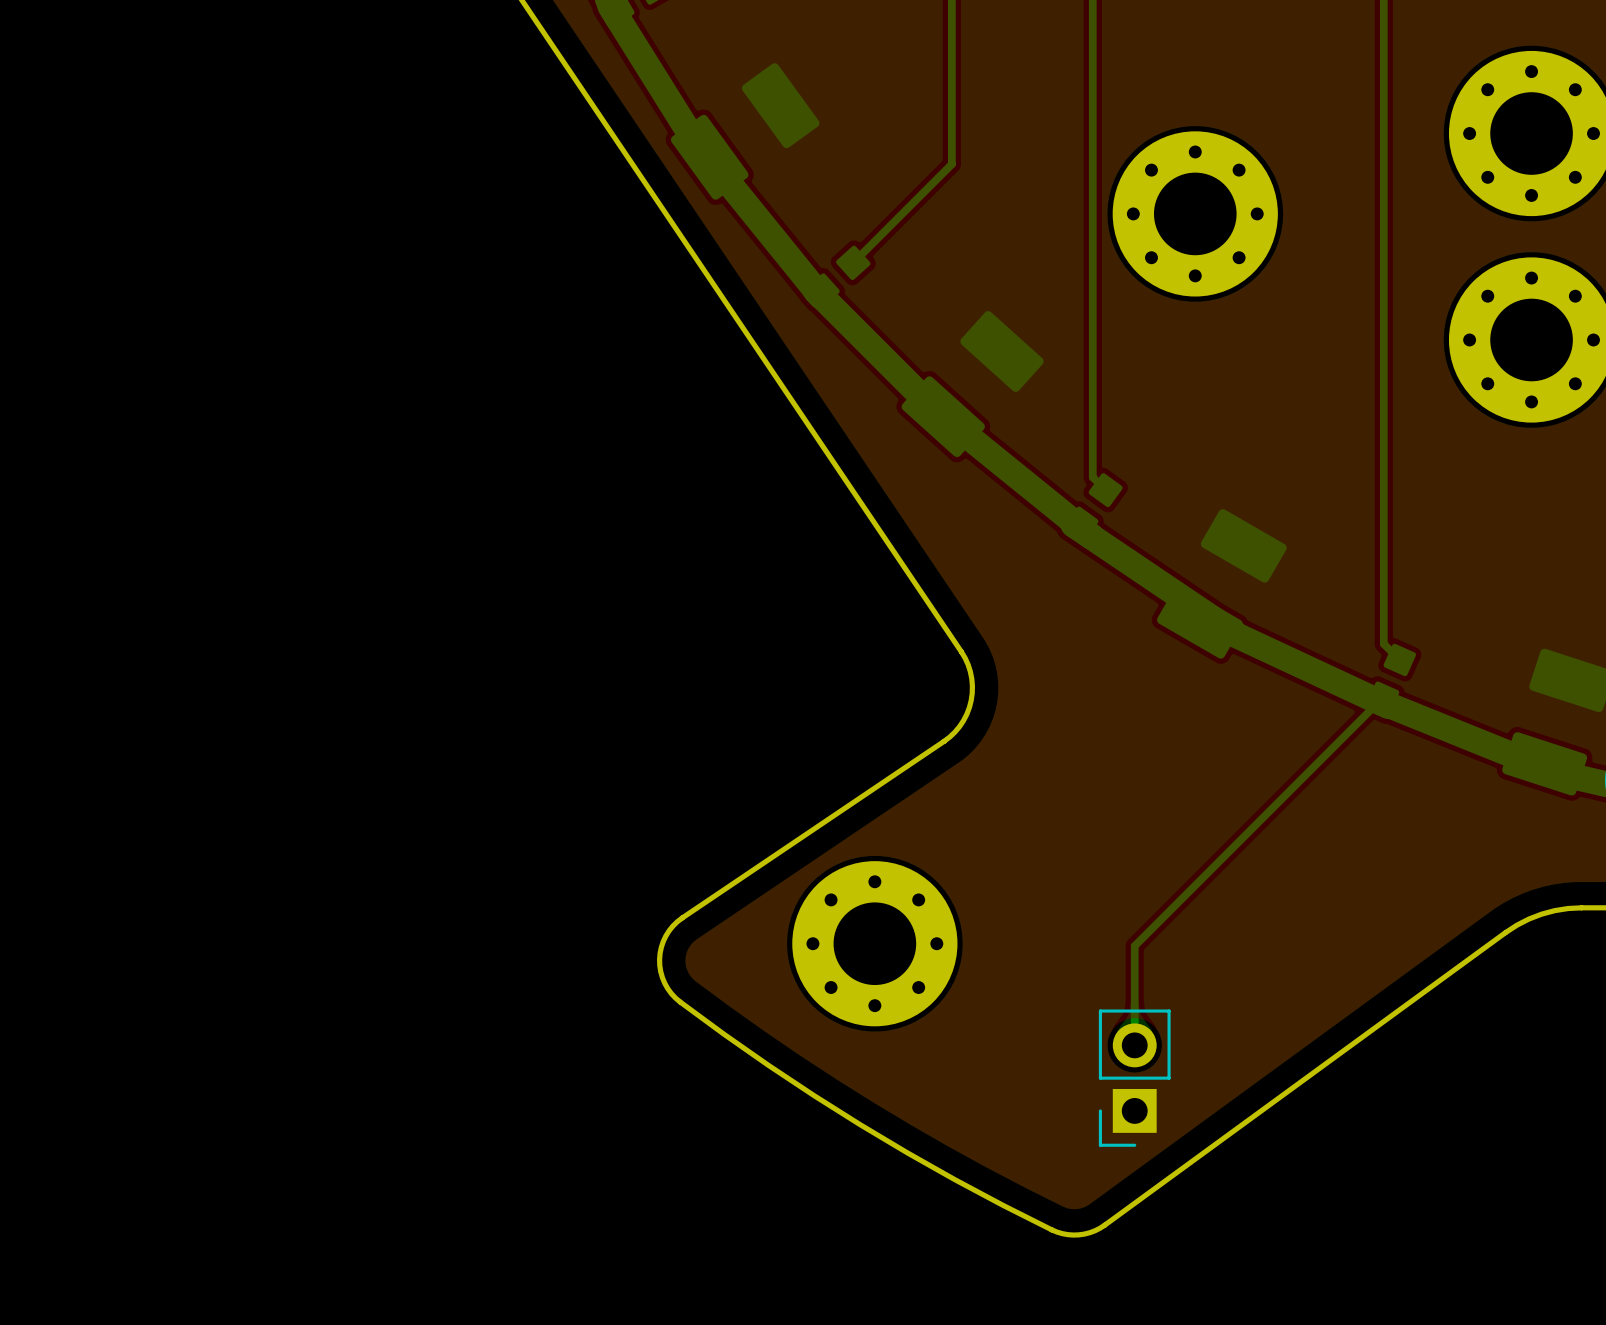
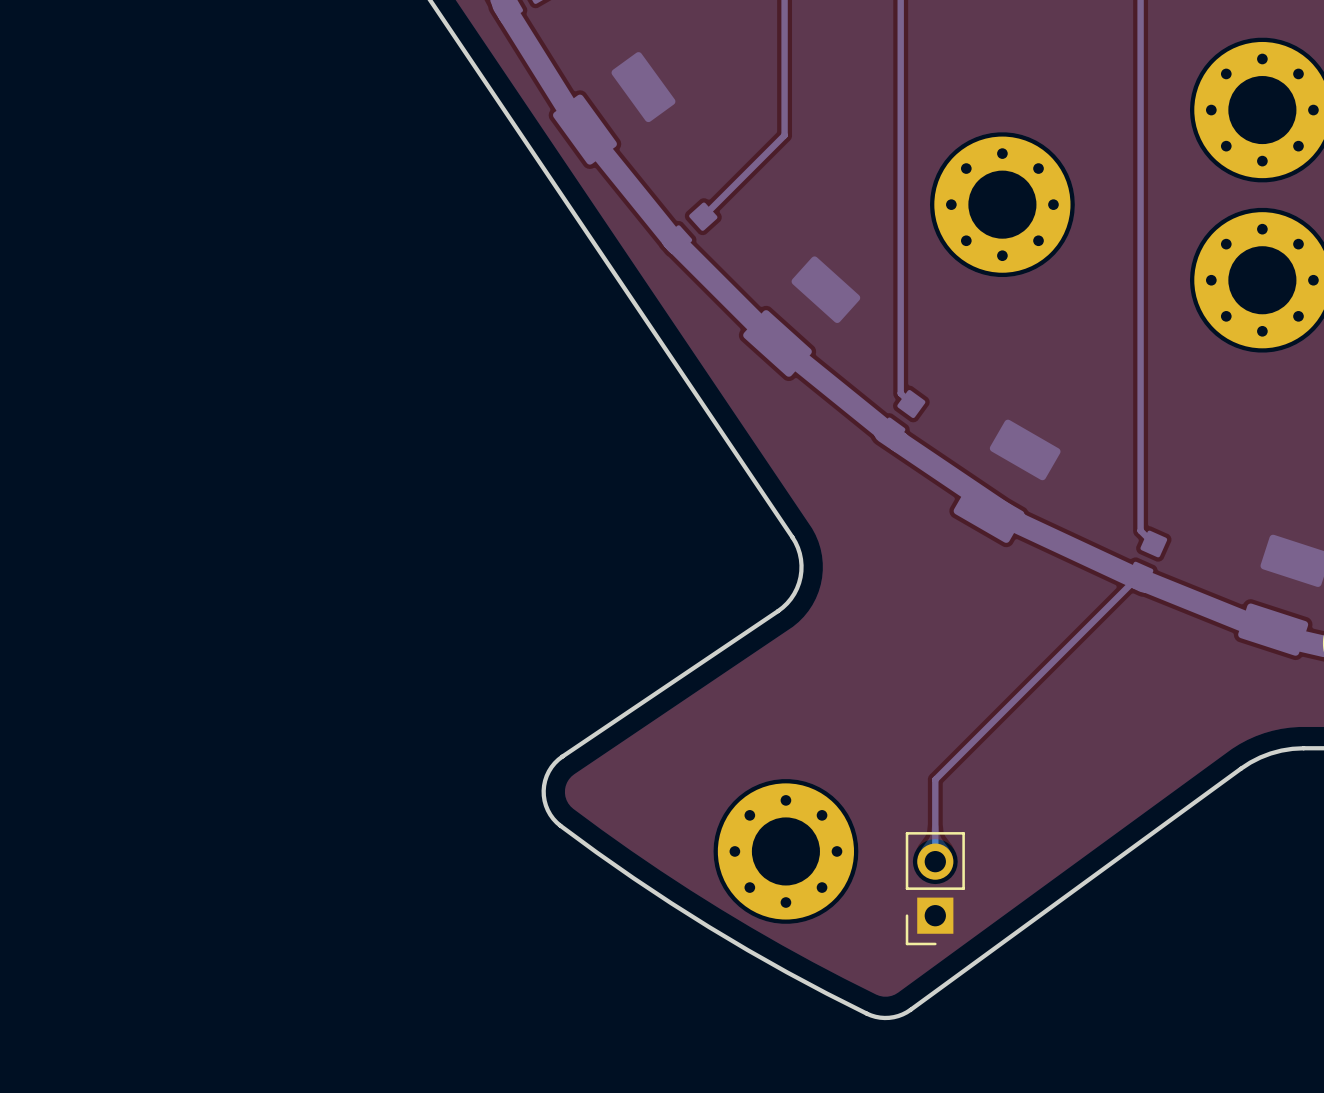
part position: (1195, 213) -> (1002, 204)
part position: (874, 943) -> (785, 851)

